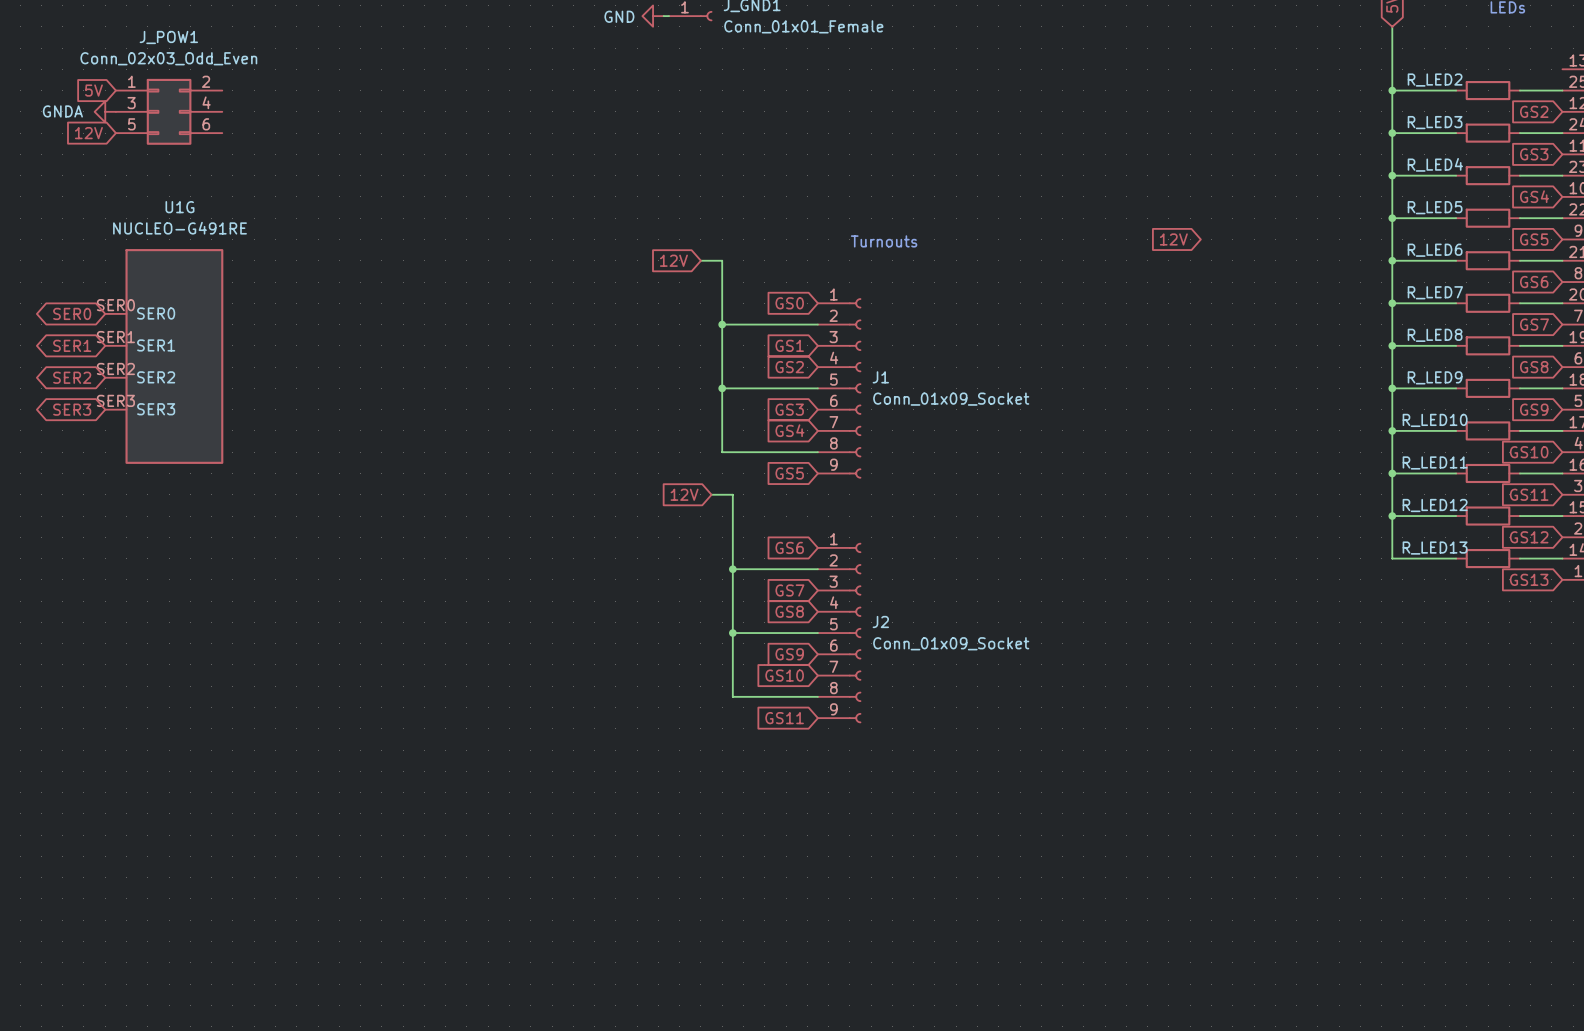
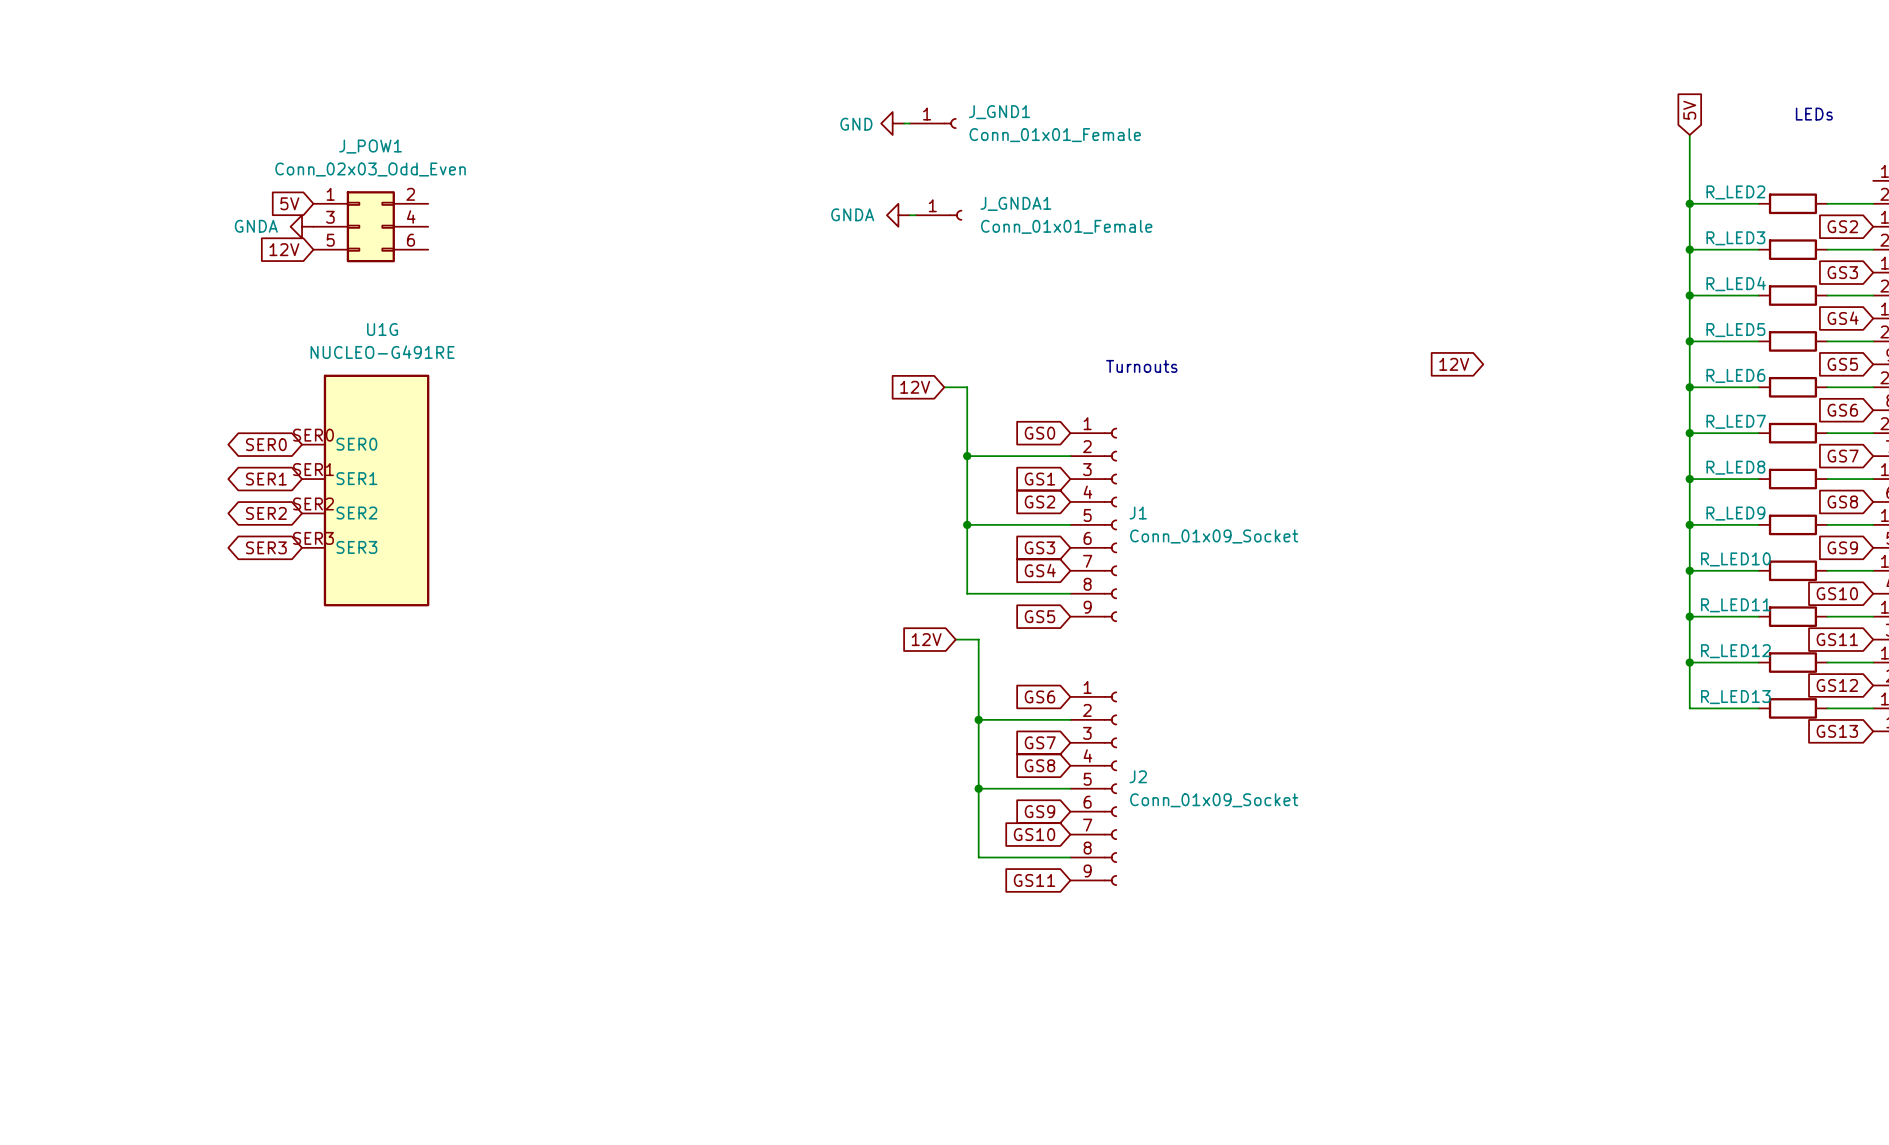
power symbol: none -> GNDA (898, 215)
wire: none -> (909, 215) (915, 215)
J_GNDA1: none -> Conn_01x01_Female (938, 215)

